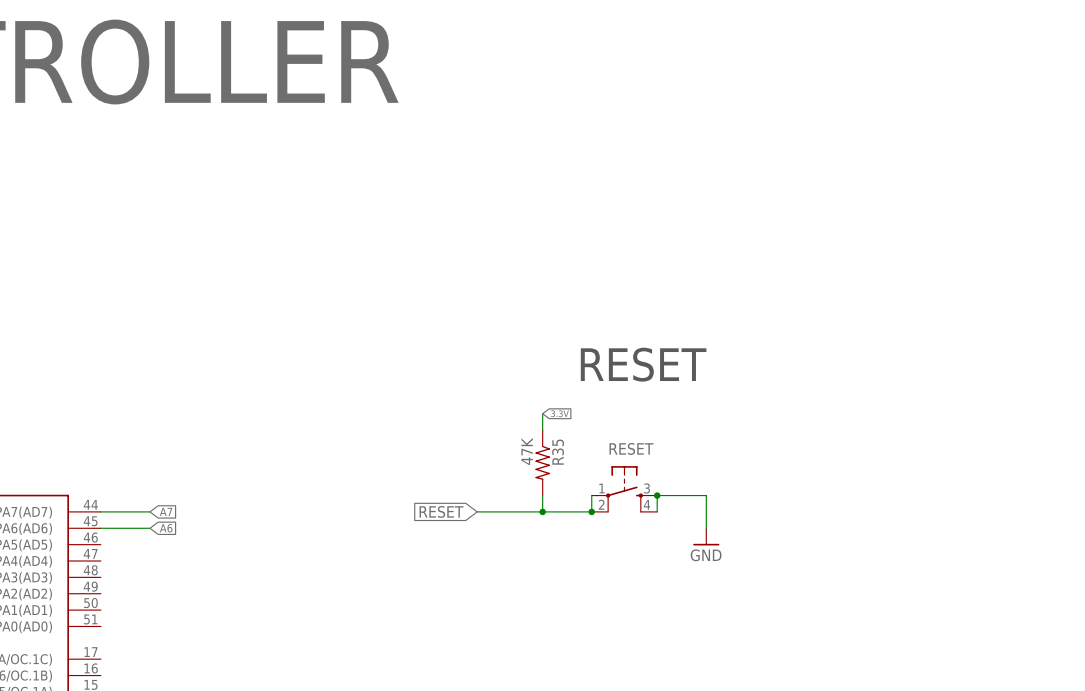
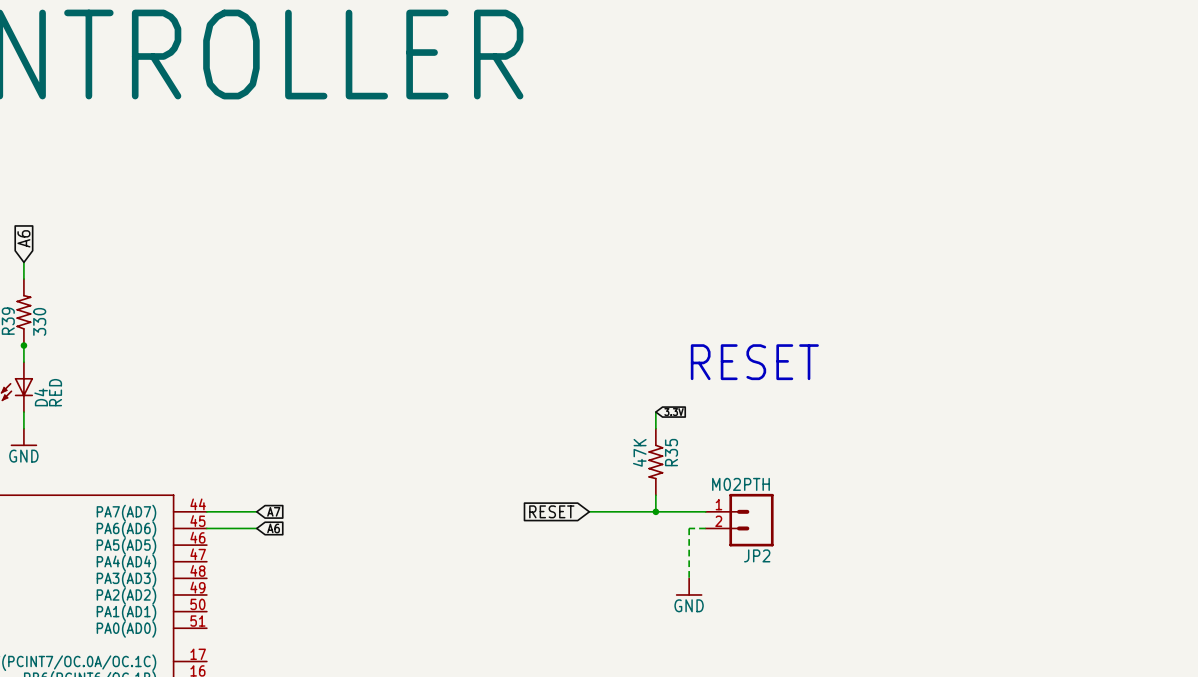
RESET: (624, 489) -> none
wire: (591, 495) (591, 511) -> none
junction: (657, 495) -> none
junction: (591, 511) -> none
wire: (657, 511) (657, 495) (706, 495) (706, 528) -> none
JP2: none -> M02PTH (739, 520)
wire: none -> (705, 528) (689, 528) (689, 578)
power symbol position: GND (706, 536) -> GND (689, 587)

